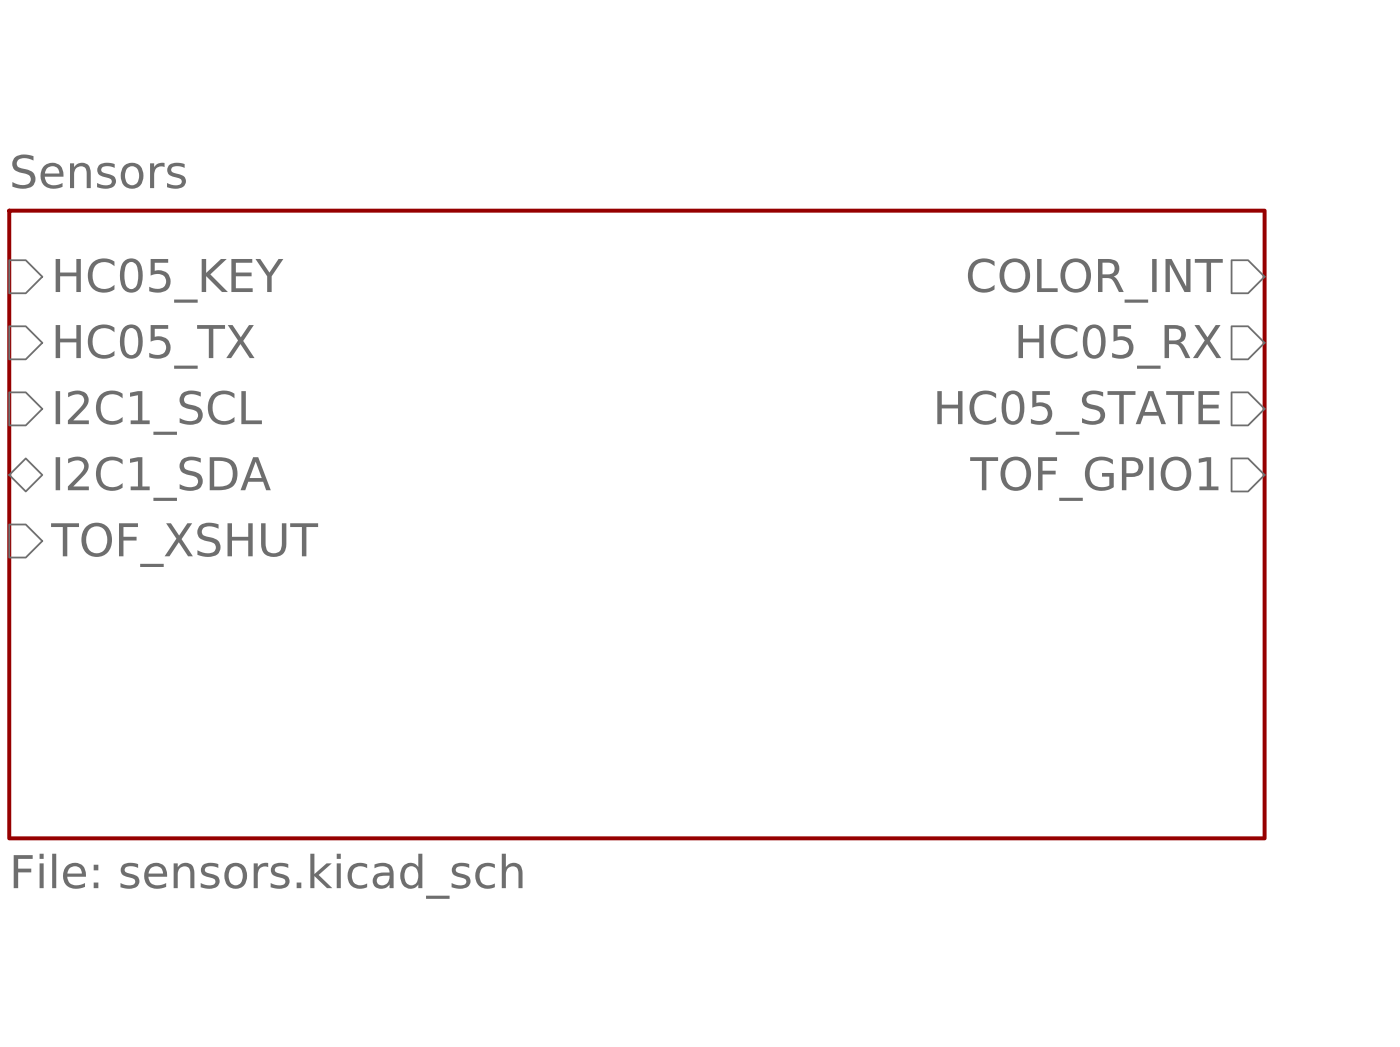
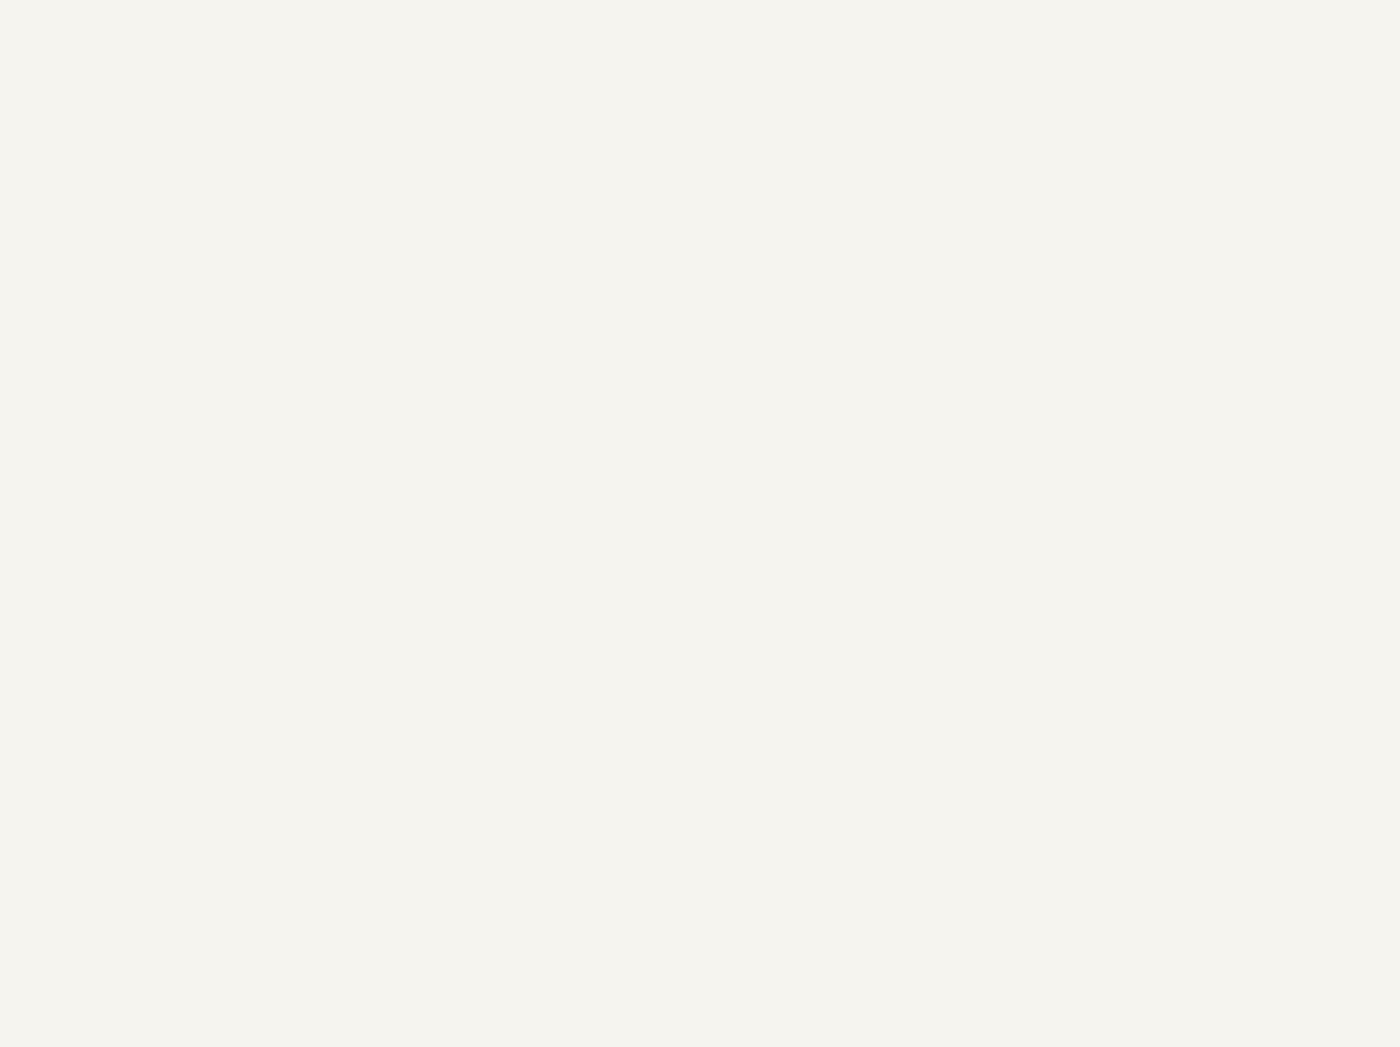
sheet pin: HC05_KEY (169, 280) -> none
sheet pin: COLOR_INT (1095, 280) -> none
sheet pin: HC05_TX (155, 346) -> none
sheet pin: HC05_RX (1119, 346) -> none
sheet pin: I2C1_SCL (158, 412) -> none
sheet pin: HC05_STATE (1078, 412) -> none
sheet pin: I2C1_SDA (163, 478) -> none
sheet pin: TOF_GPIO1 (1094, 478) -> none
sheet Sensors: File: sensors.kicad_sch (636, 524) -> none
sheet pin: TOF_XSHUT (184, 544) -> none

